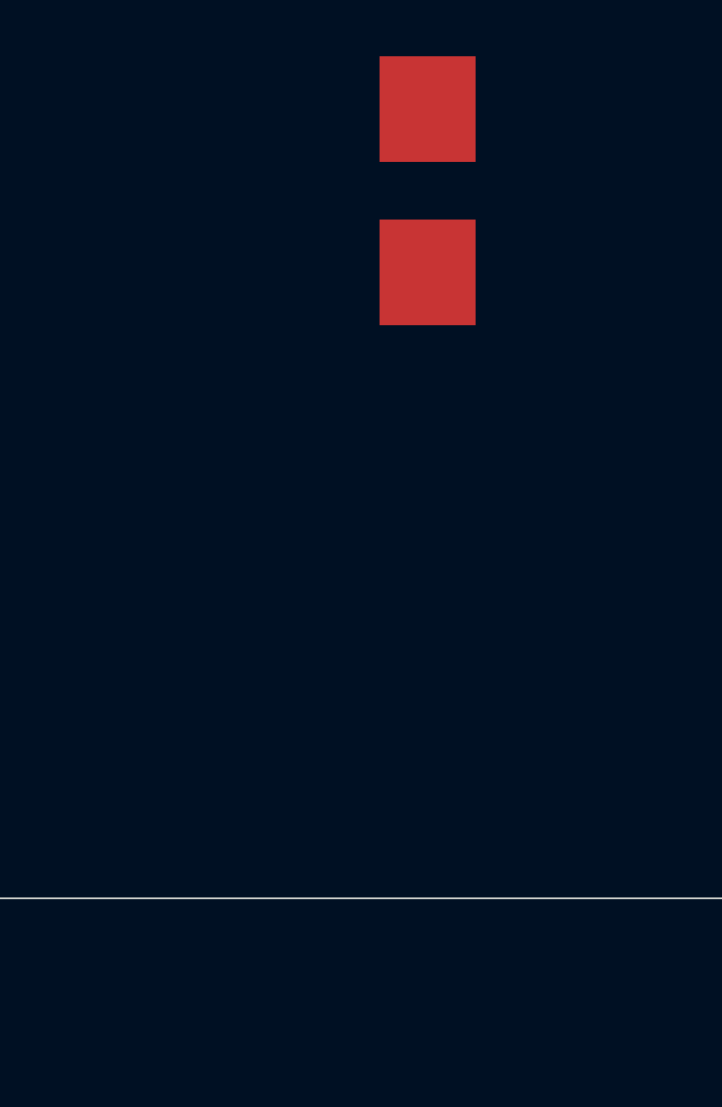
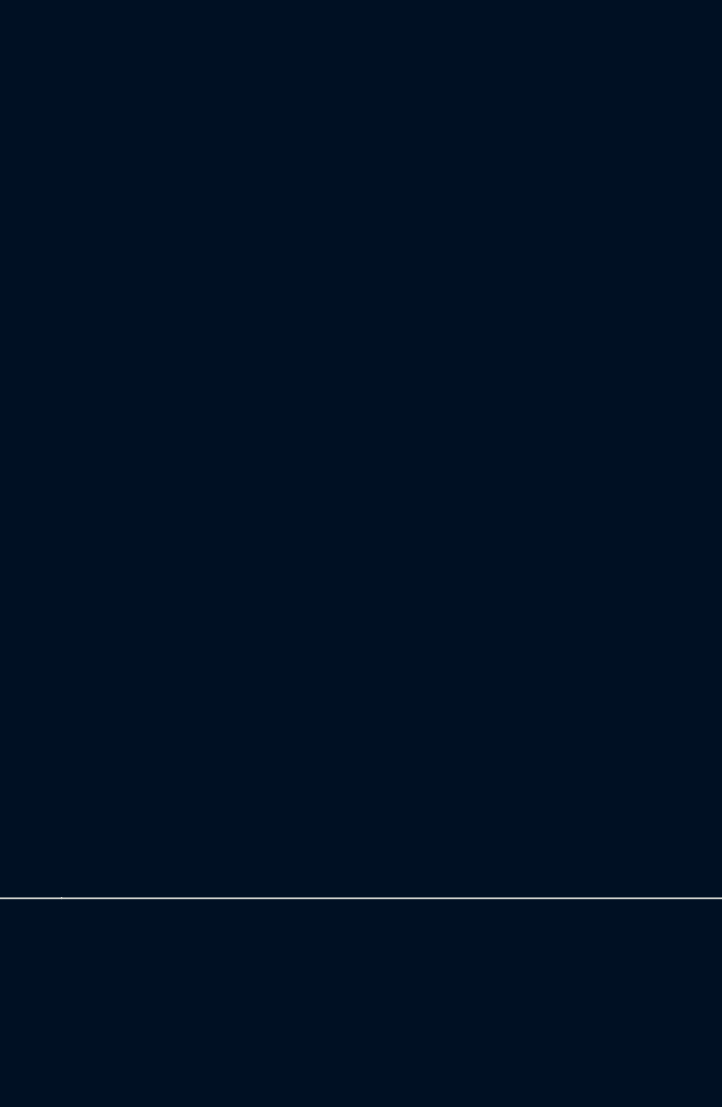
part: (427, 190) -> none

